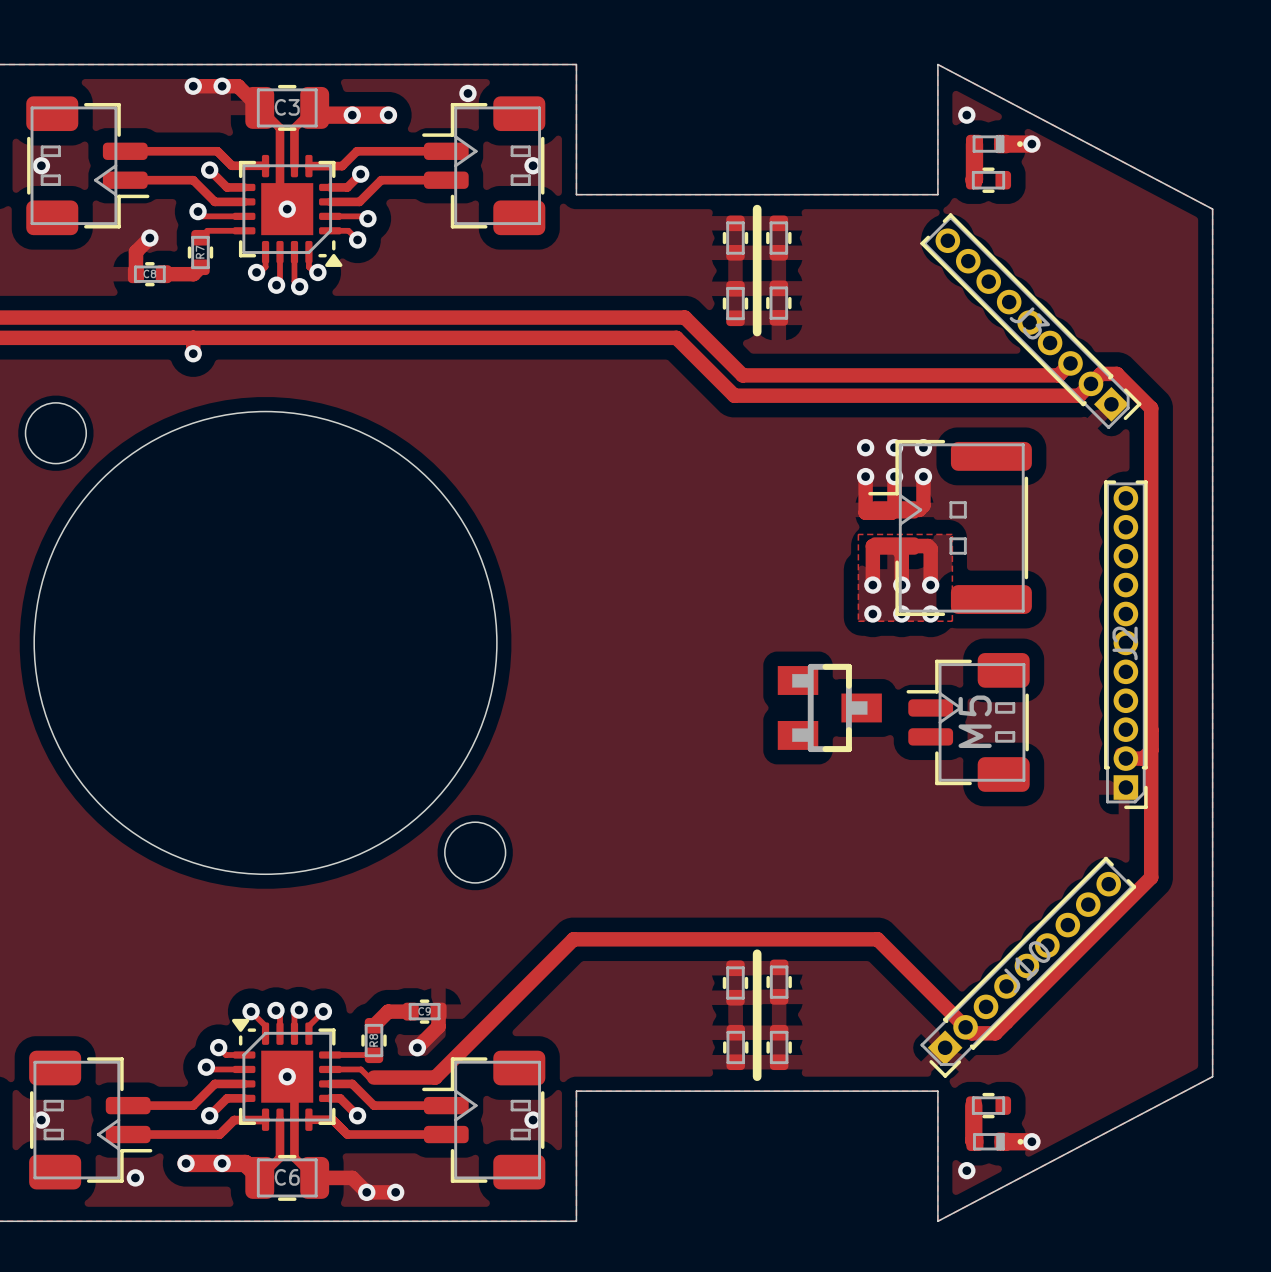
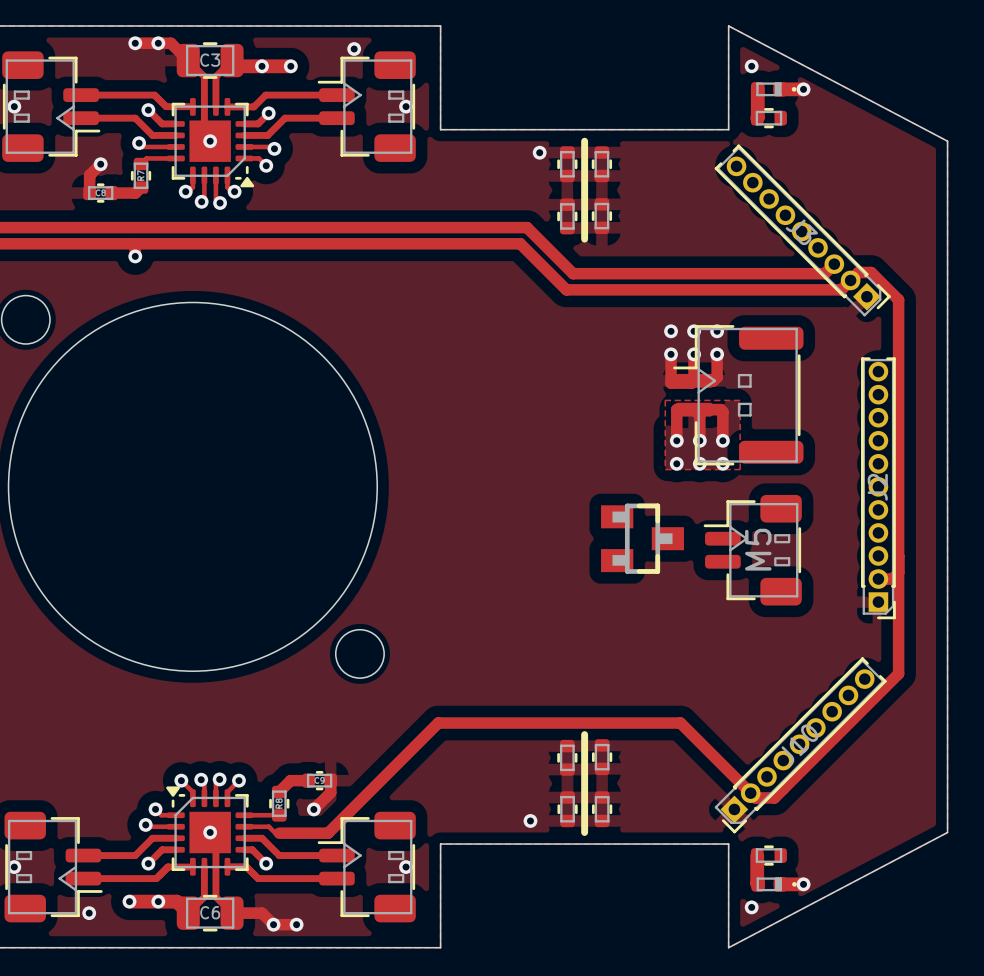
via: none -> (539, 152)
via: none -> (530, 820)

